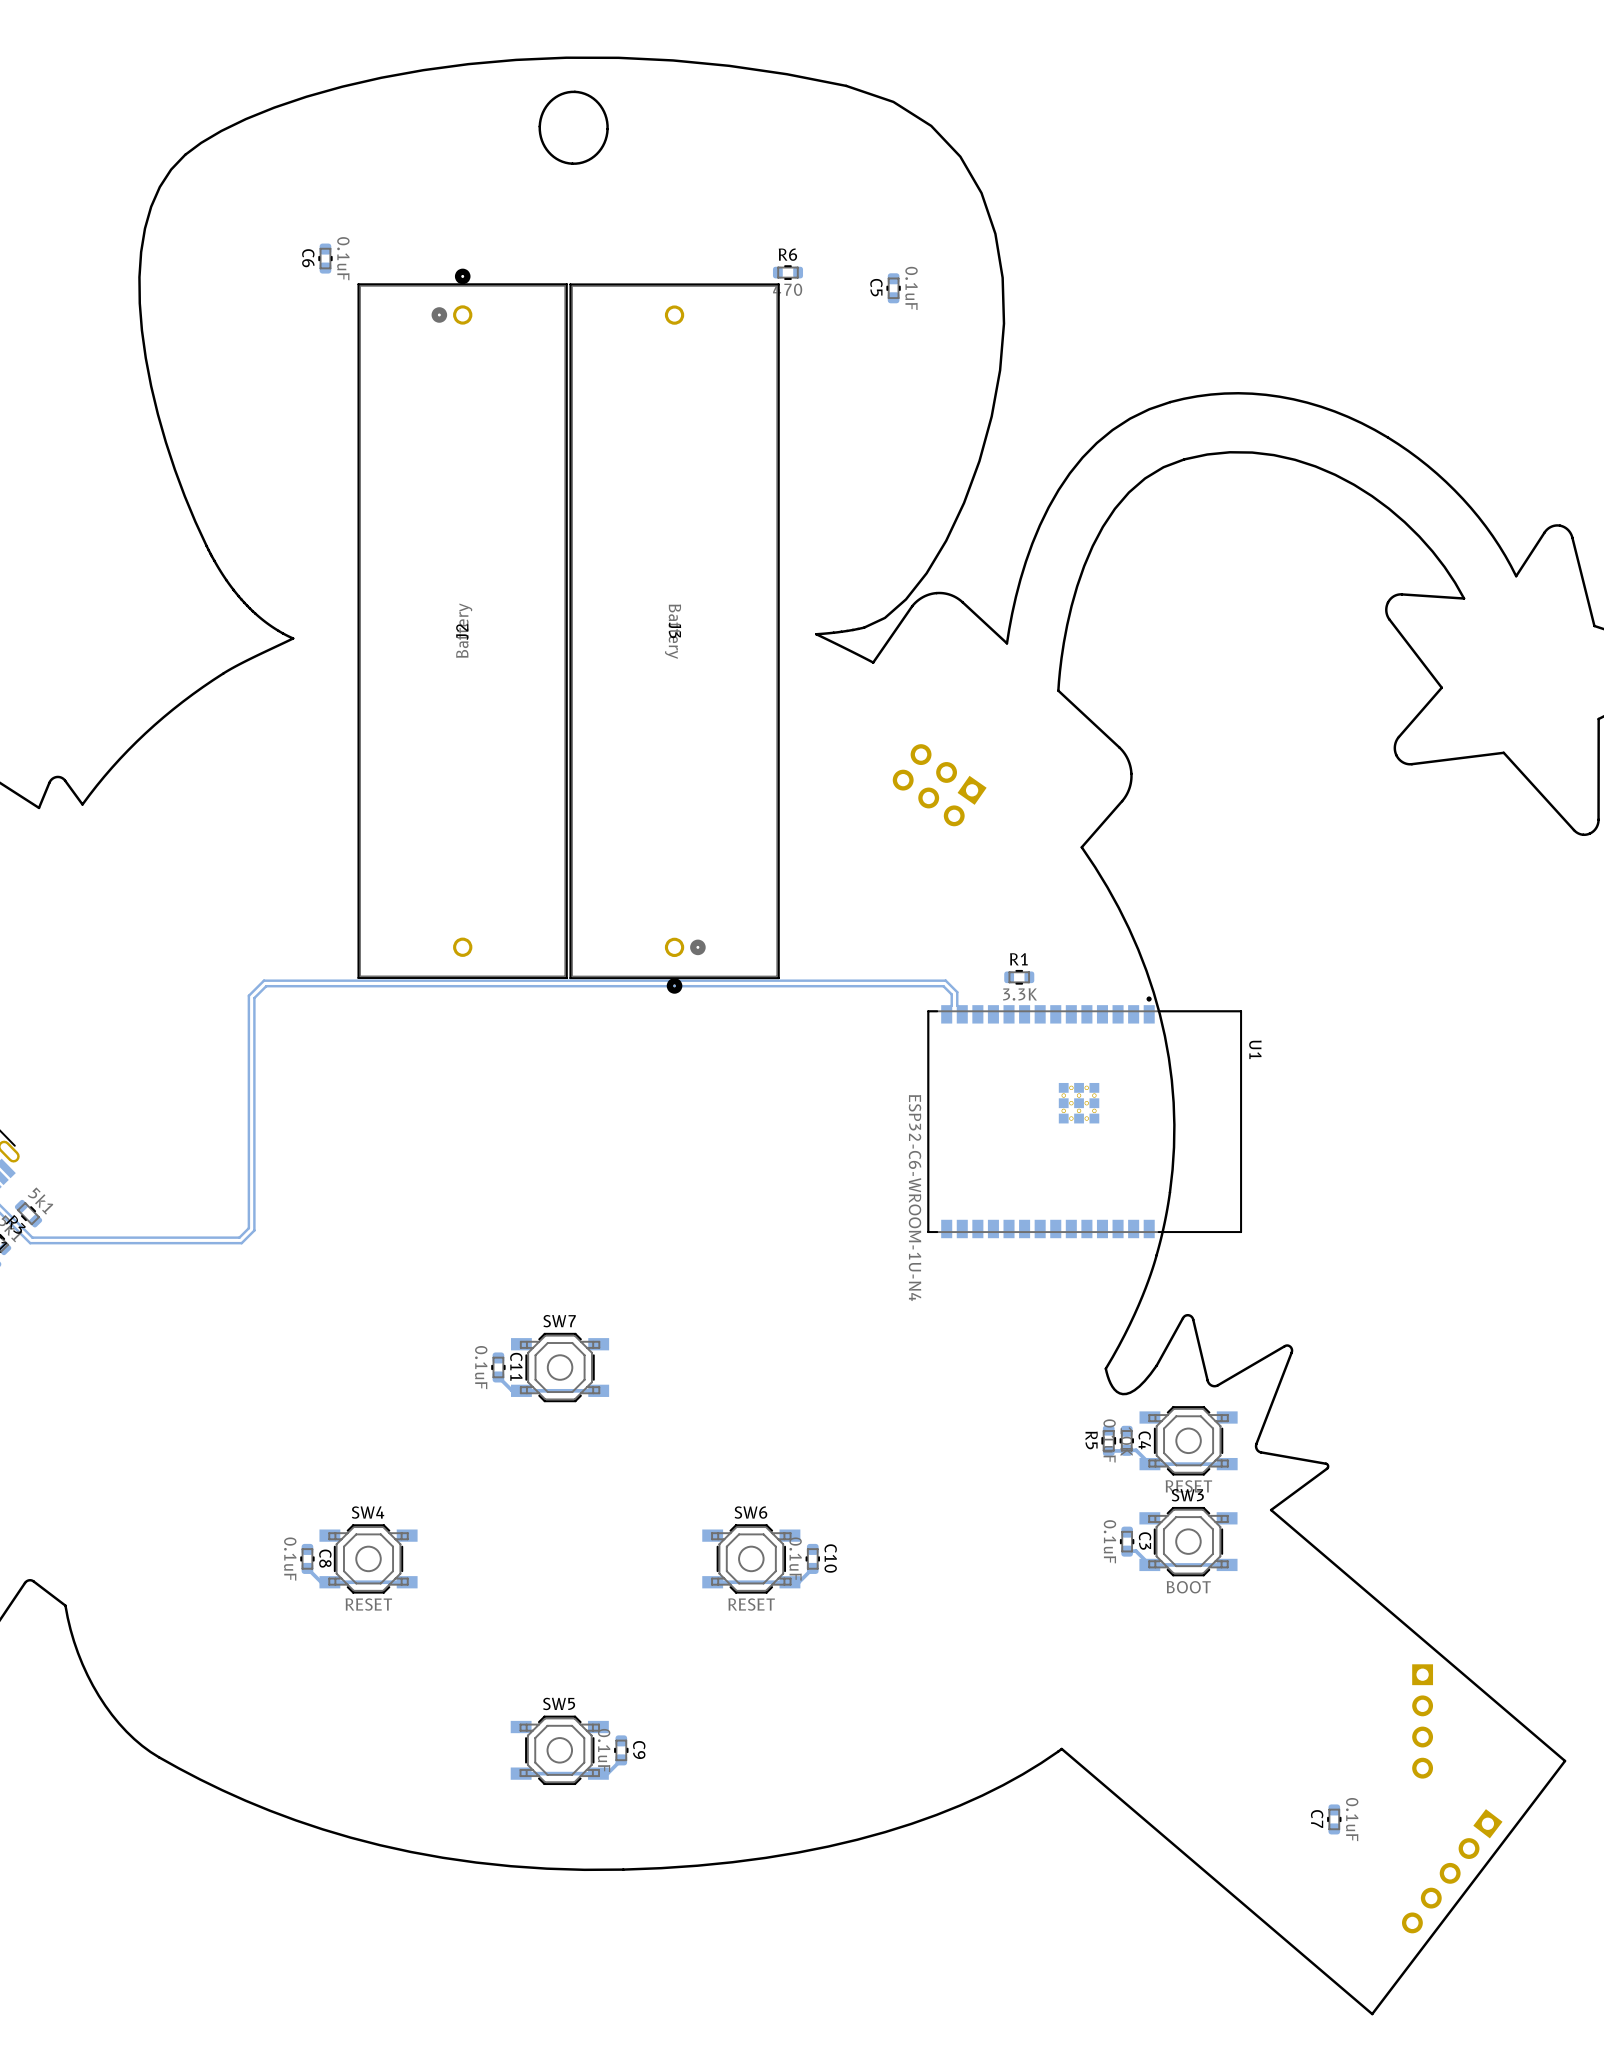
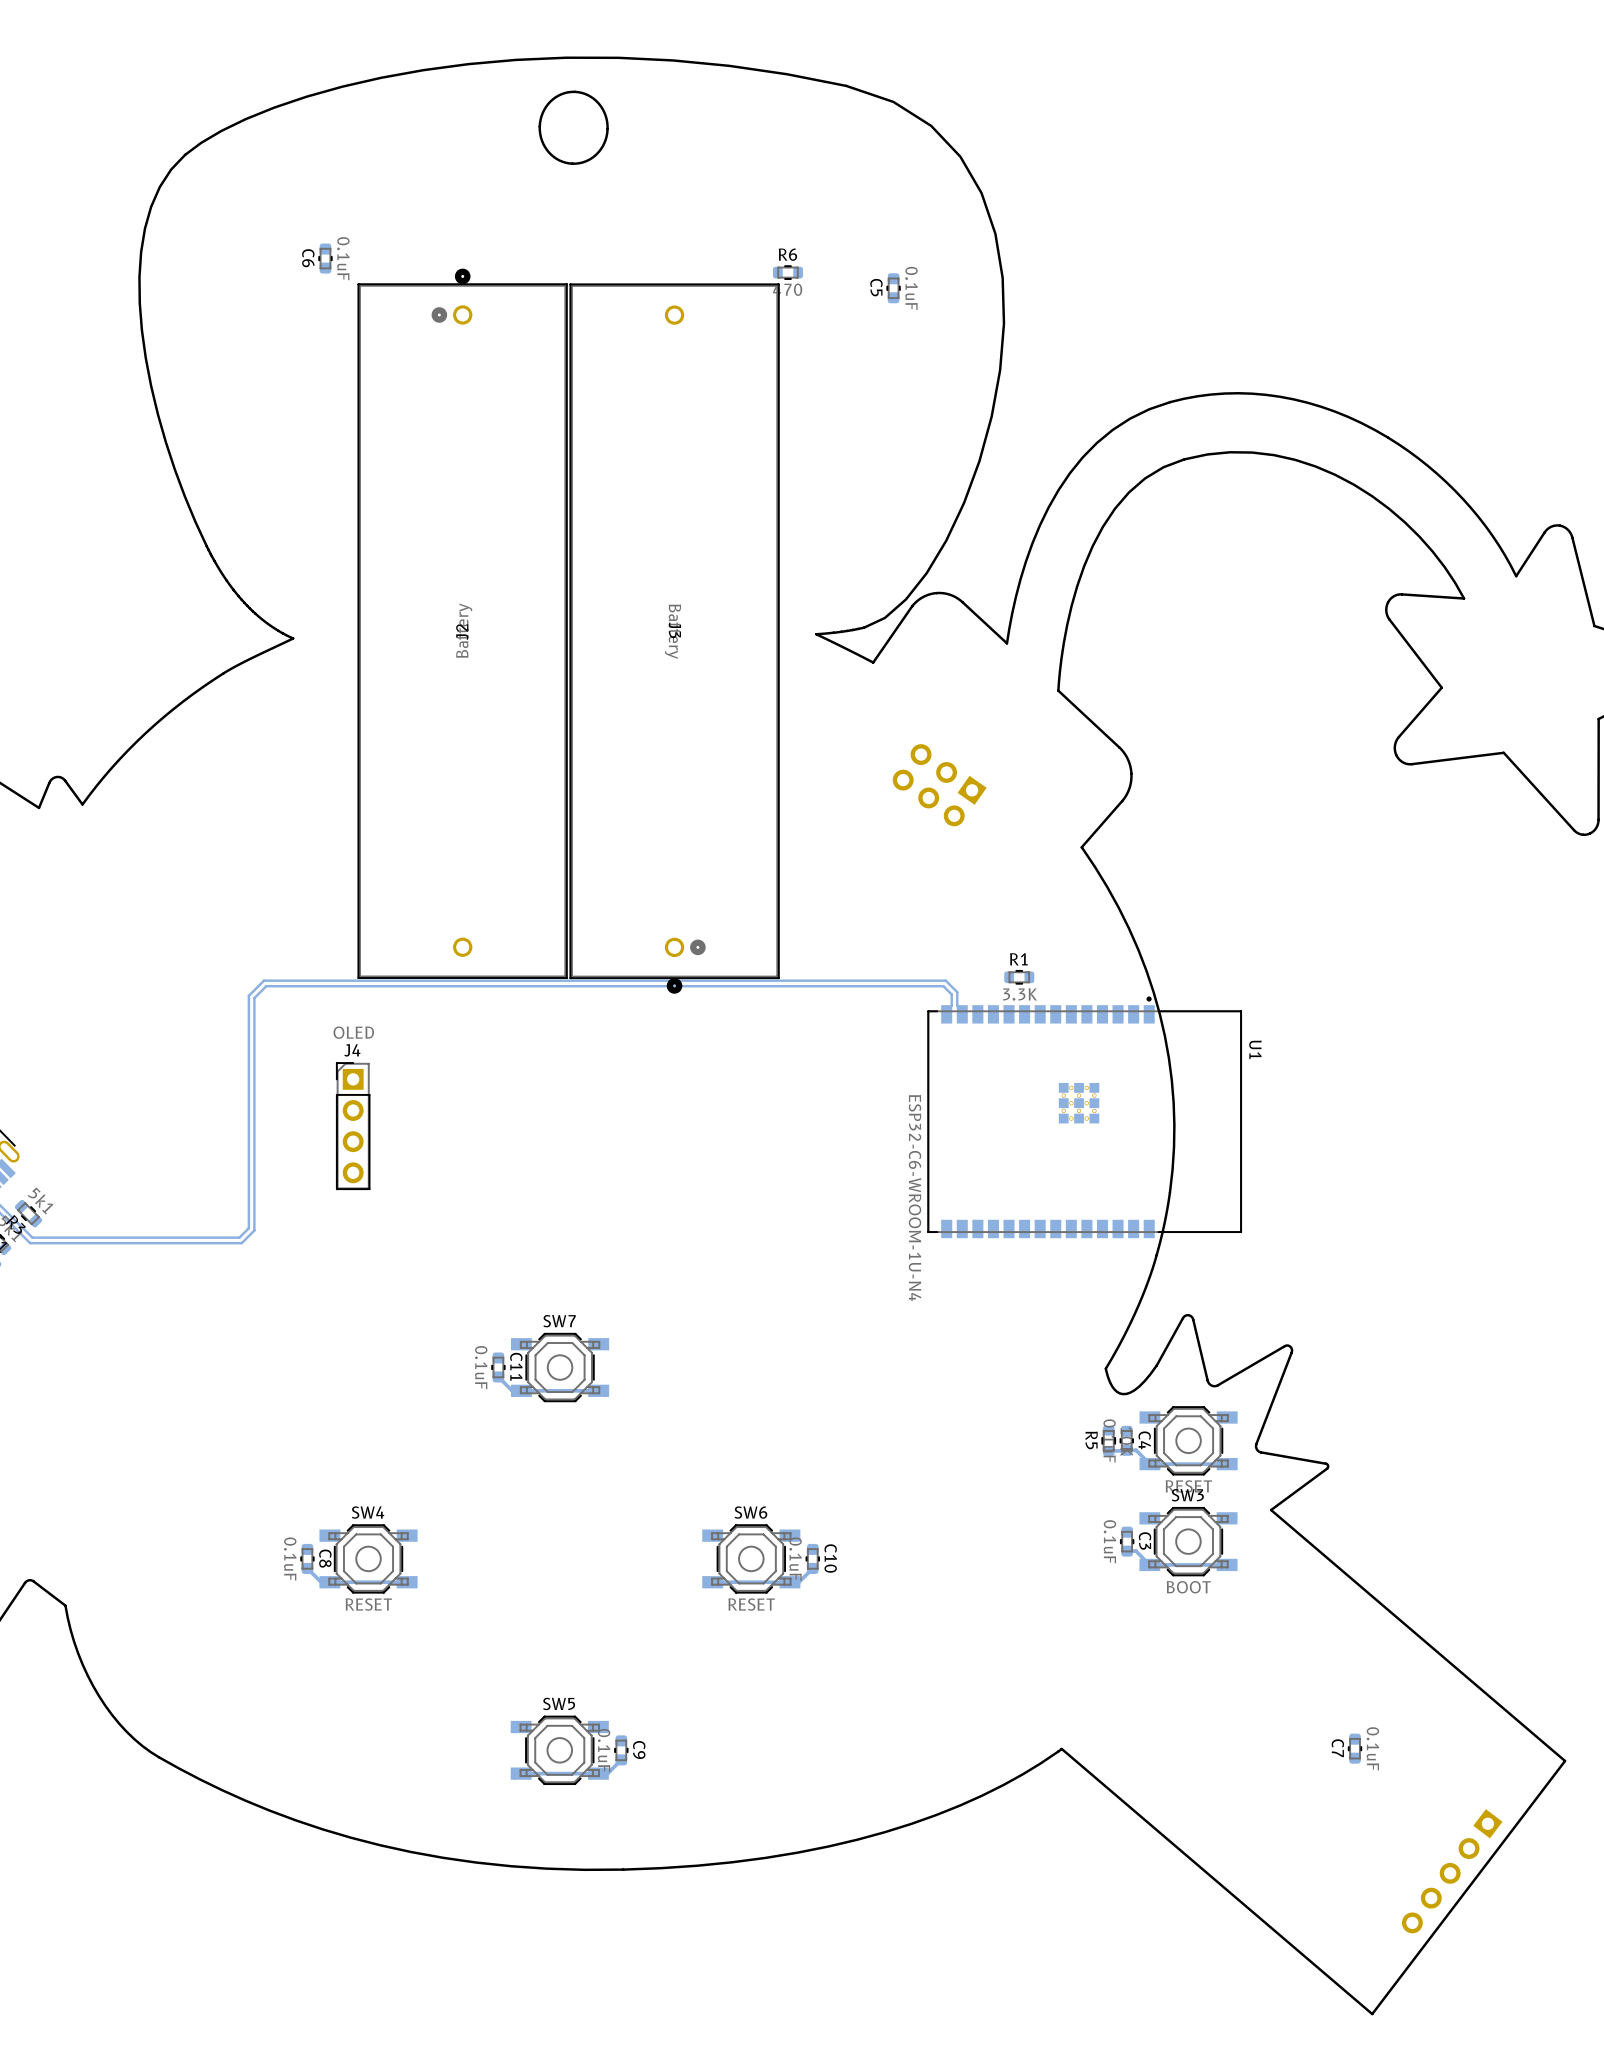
J4: none -> OLED (353, 1126)
part: (1422, 1721) -> none
C7 position: (1334, 1819) -> (1355, 1748)

